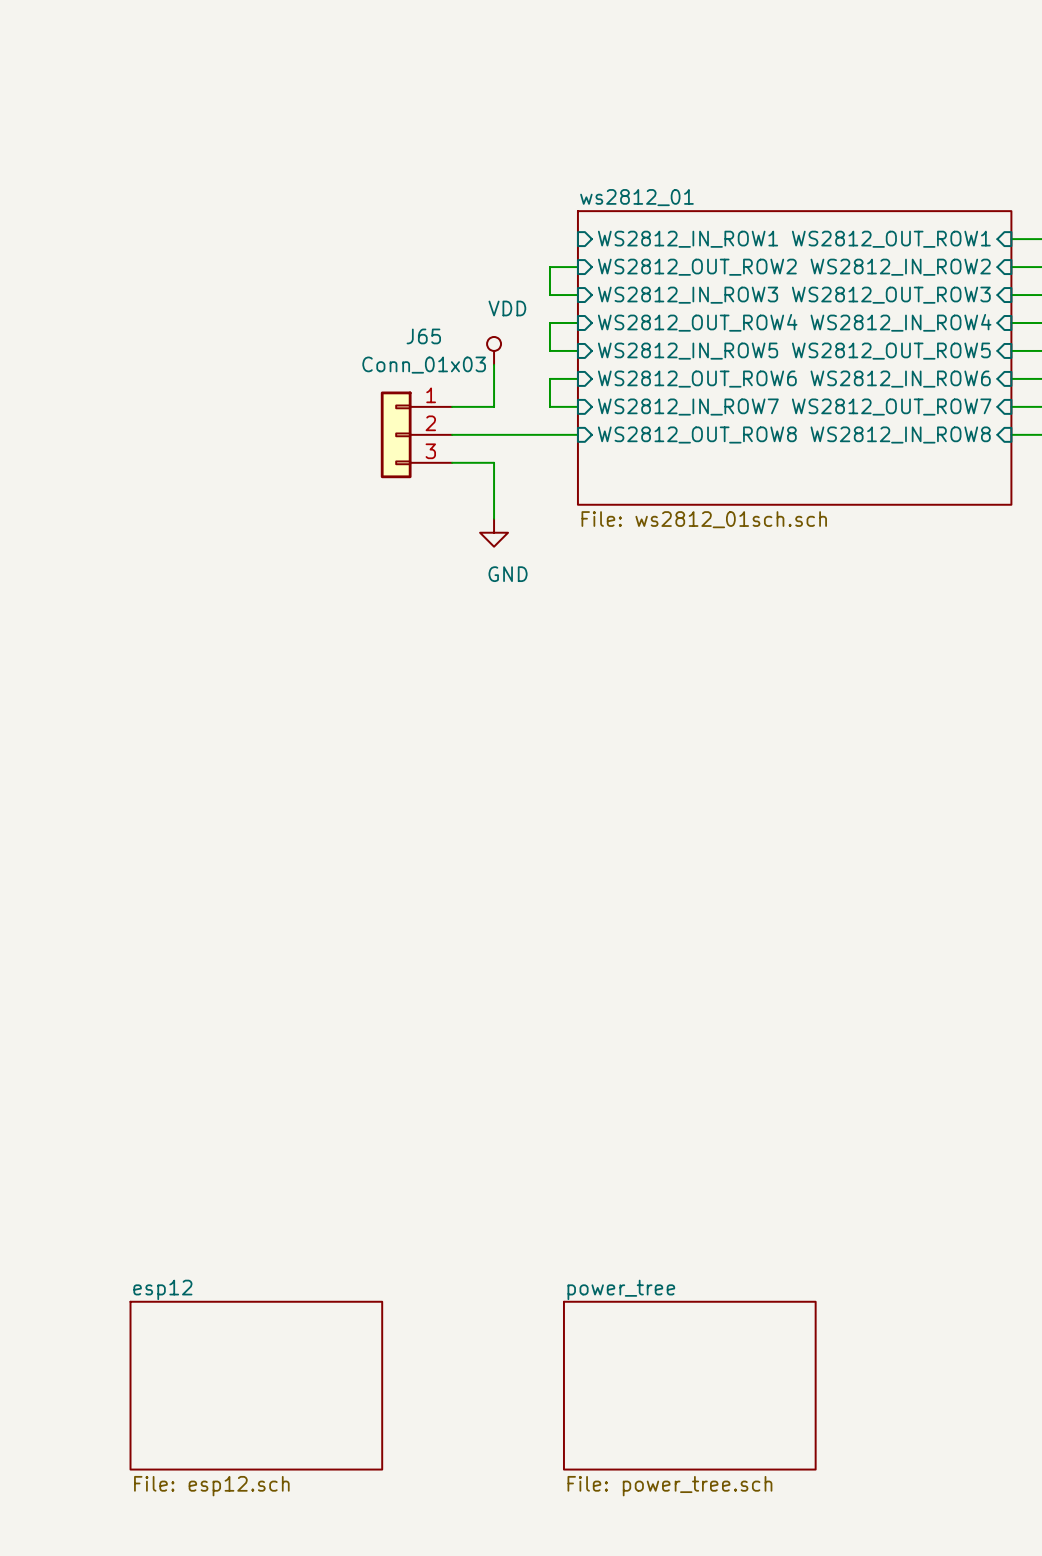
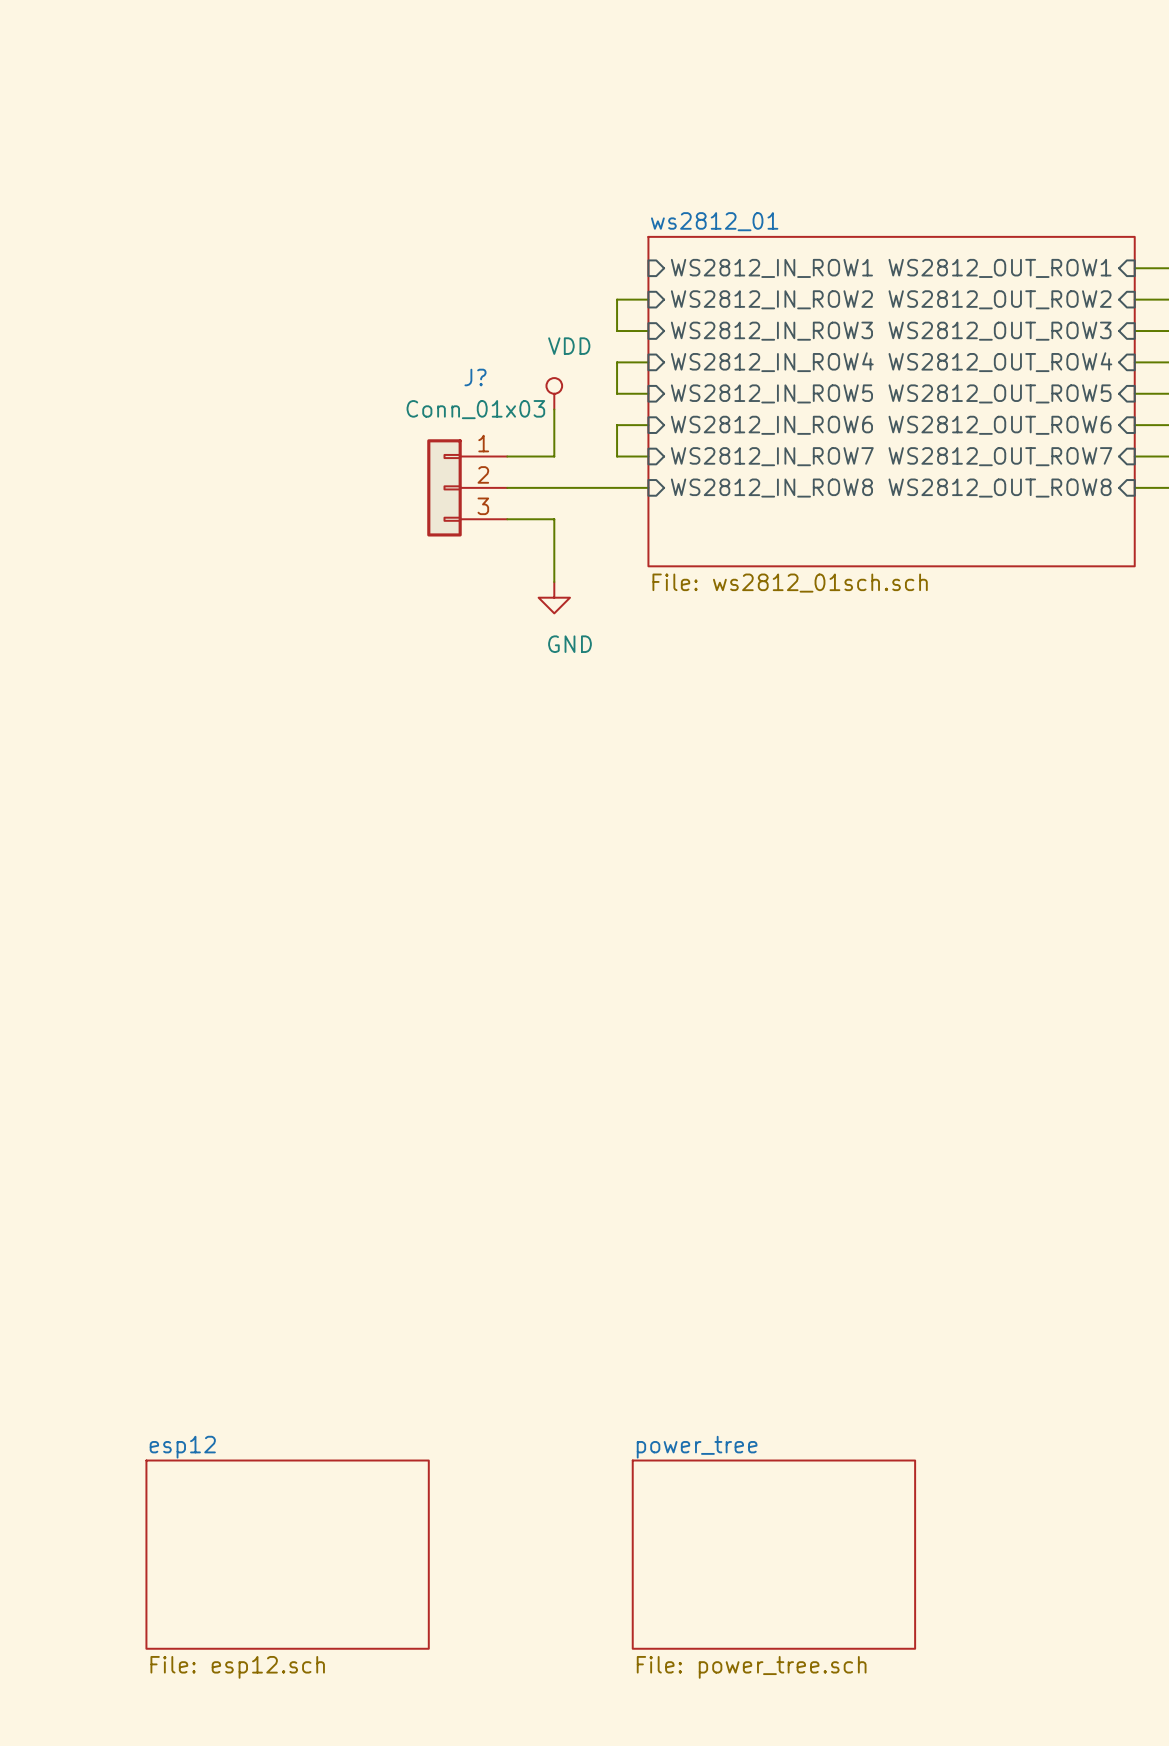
sheet pin: WS2812_OUT_ROW2 (697, 267) -> WS2812_IN_ROW2 (771, 299)
sheet pin: WS2812_IN_ROW2 (900, 267) -> WS2812_OUT_ROW2 (1000, 299)
sheet pin: WS2812_OUT_ROW4 (697, 322) -> WS2812_IN_ROW4 (772, 362)
sheet pin: WS2812_IN_ROW4 (900, 322) -> WS2812_OUT_ROW4 (1000, 362)
J65 name: J65 (423, 336) -> J? (475, 377)
sheet pin: WS2812_OUT_ROW6 (697, 379) -> WS2812_IN_ROW6 (771, 425)
sheet pin: WS2812_IN_ROW6 (900, 379) -> WS2812_OUT_ROW6 (1000, 425)
sheet pin: WS2812_OUT_ROW8 (697, 434) -> WS2812_IN_ROW8 (771, 488)
sheet pin: WS2812_IN_ROW8 (900, 434) -> WS2812_OUT_ROW8 (1000, 488)

